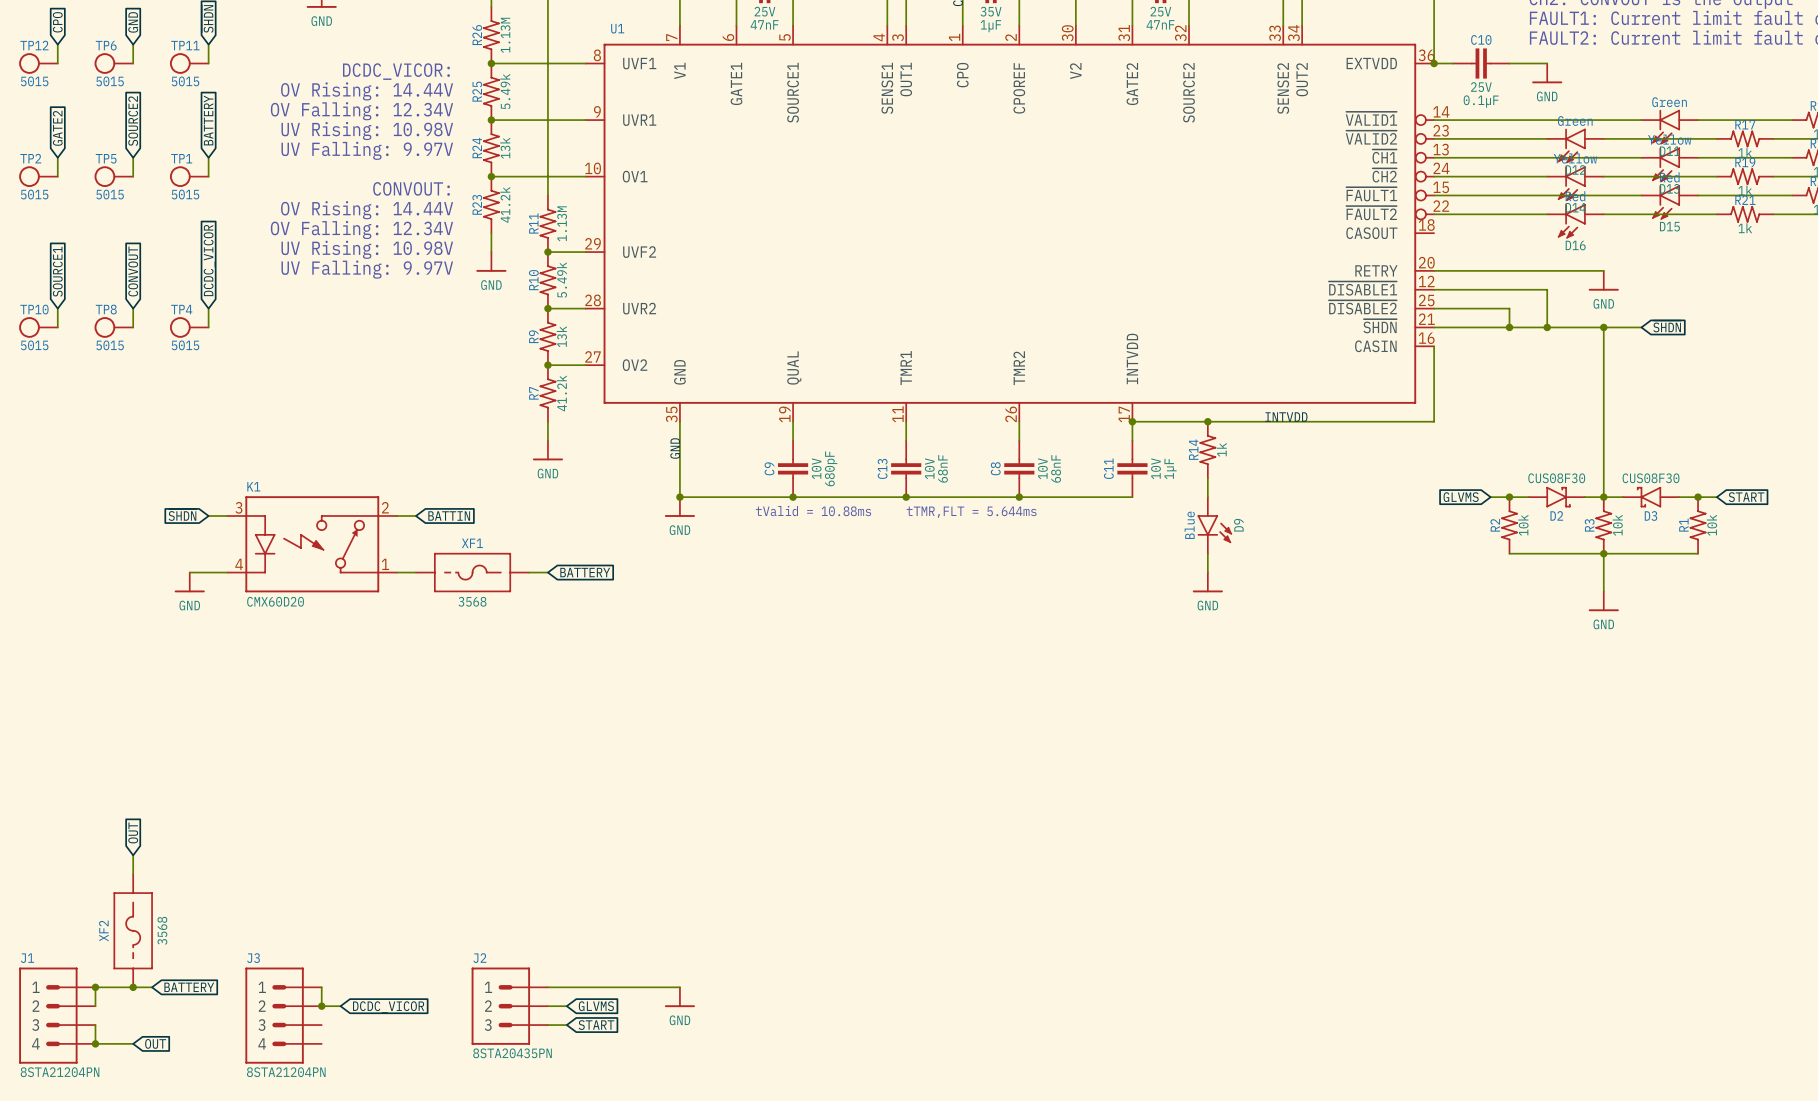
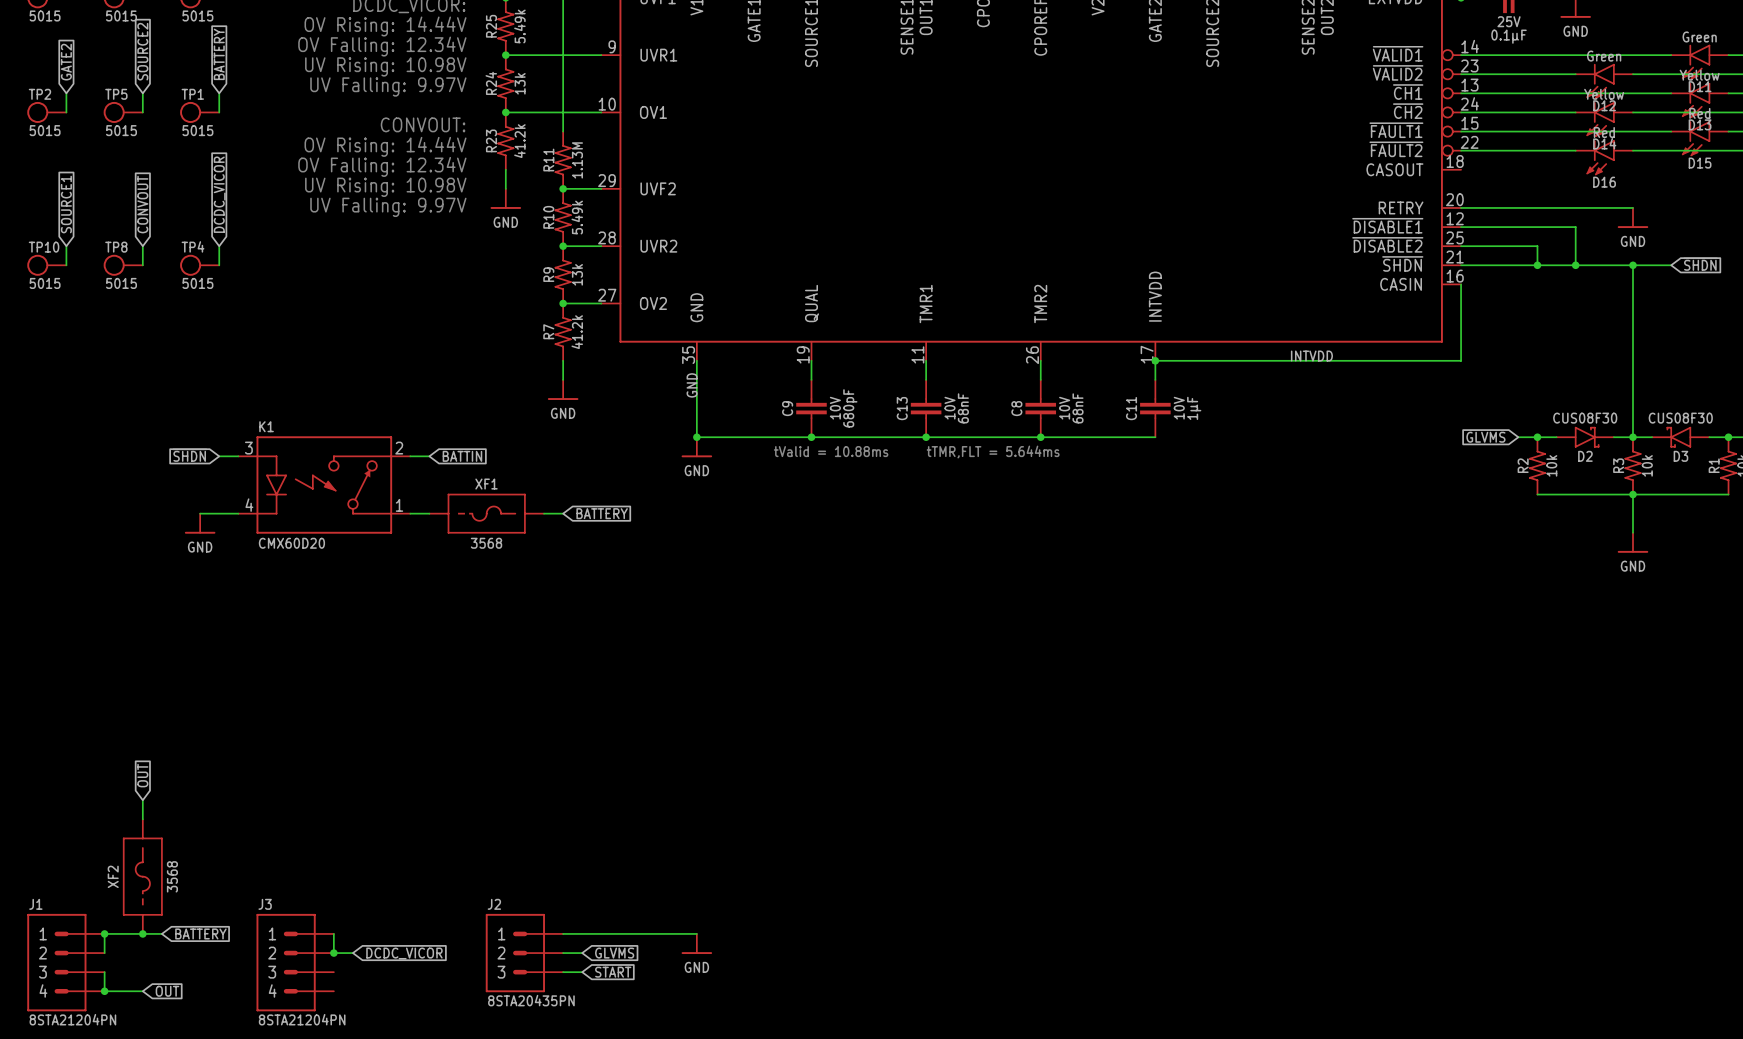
junction: (1207, 421) -> none
R14: (1207, 450) -> none
wire: (1207, 478) (1207, 497) -> none
D9: (1214, 525) -> none
wire: (1207, 553) (1207, 572) -> none
power symbol: GND (1207, 582) -> none

